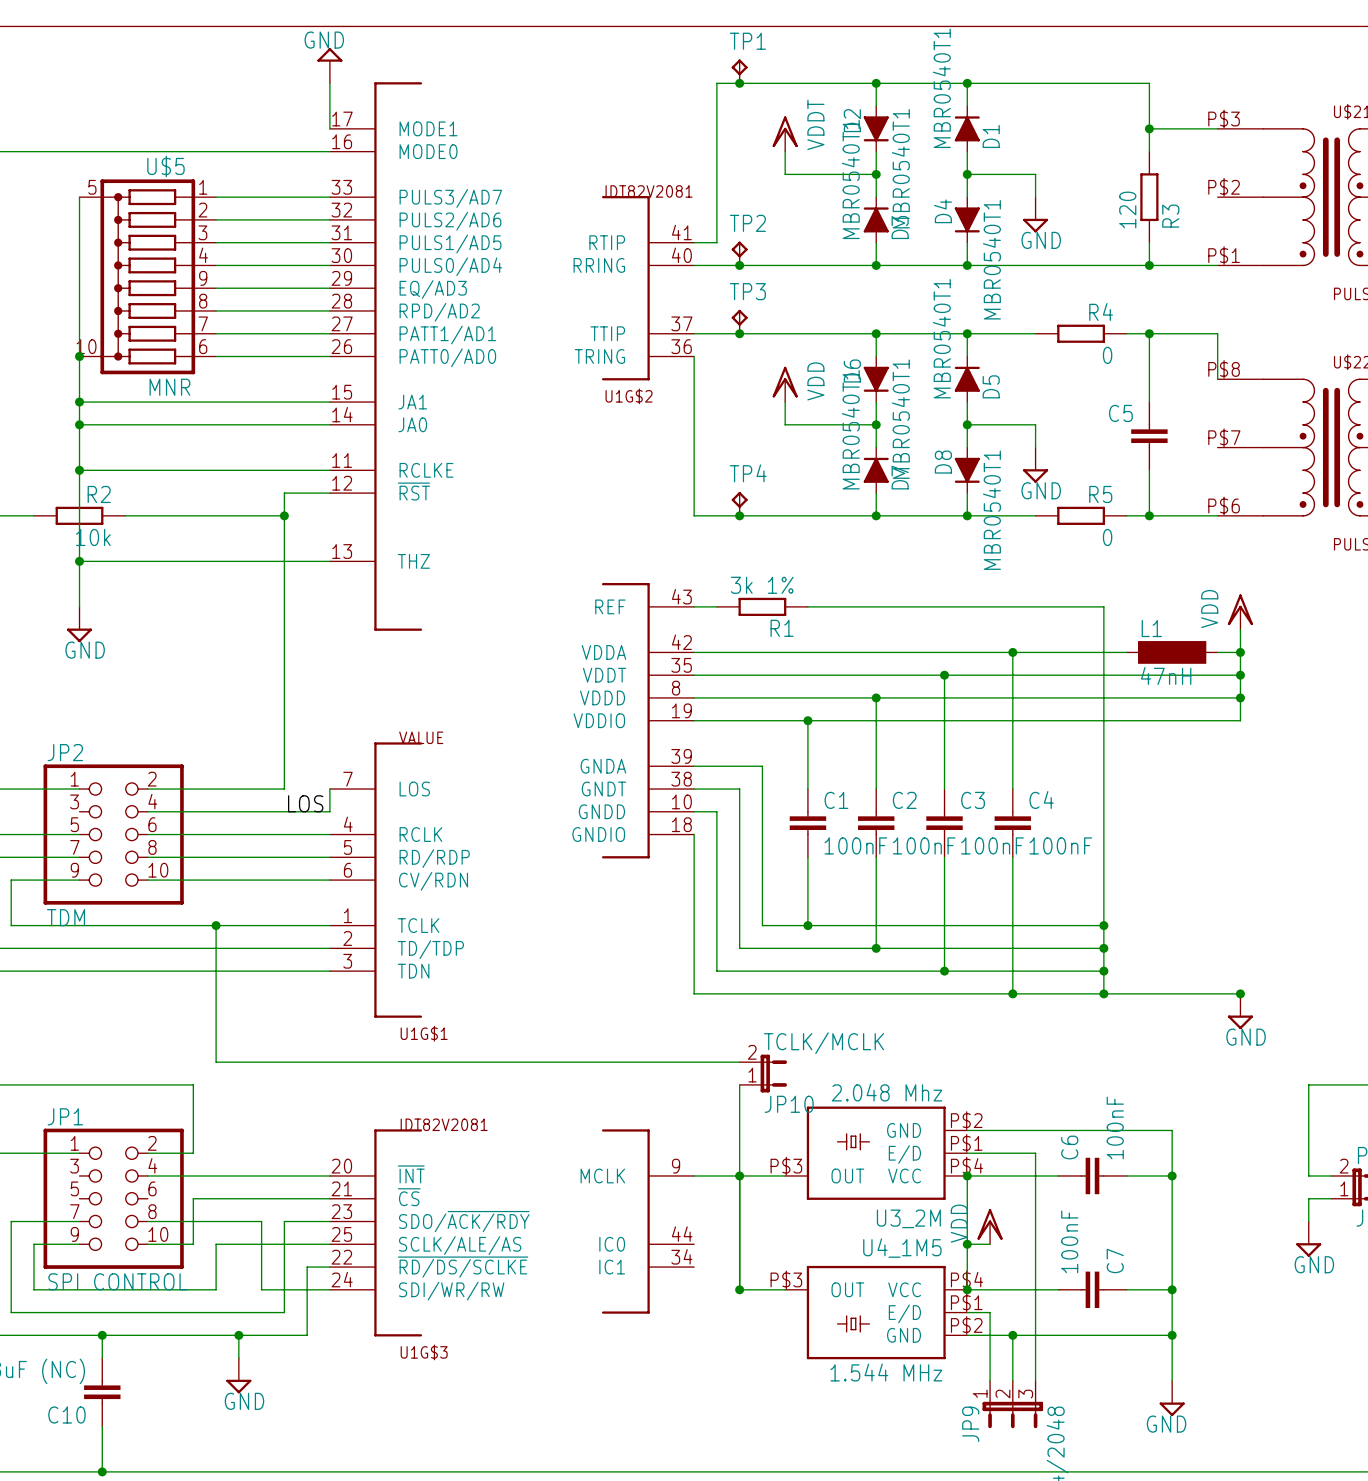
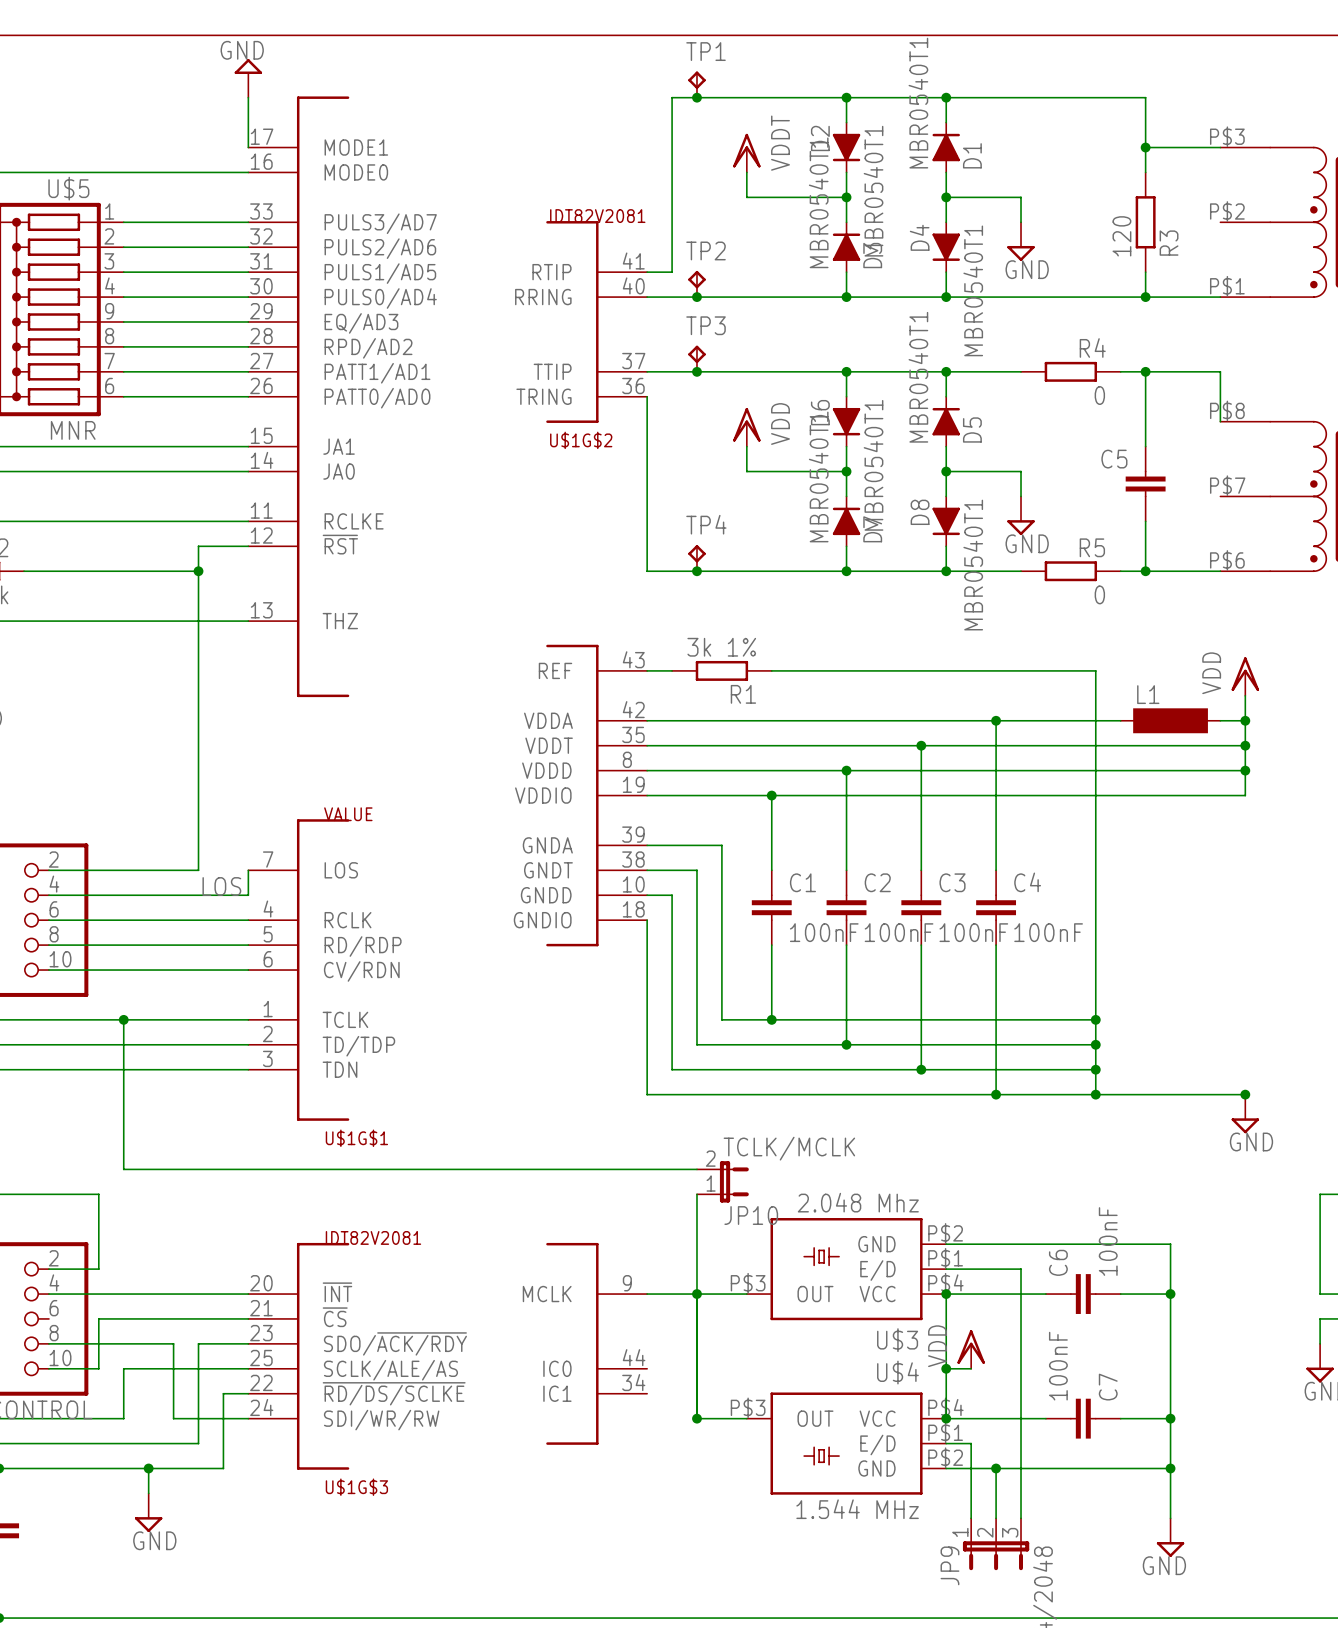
U1G$2 name: U1G$2 (629, 396) -> U$1G$2 (581, 440)
L1 value: 47nH (1166, 675) -> none
U1G$1 name: U1G$1 (424, 1033) -> U$1G$1 (356, 1138)
U3_2M name: U3_2M (908, 1218) -> U$3 (897, 1340)
U4_1M5 name: U4_1M5 (902, 1248) -> U$4 (897, 1372)
U1G$3 name: U1G$3 (424, 1352) -> U$1G$3 (356, 1487)

